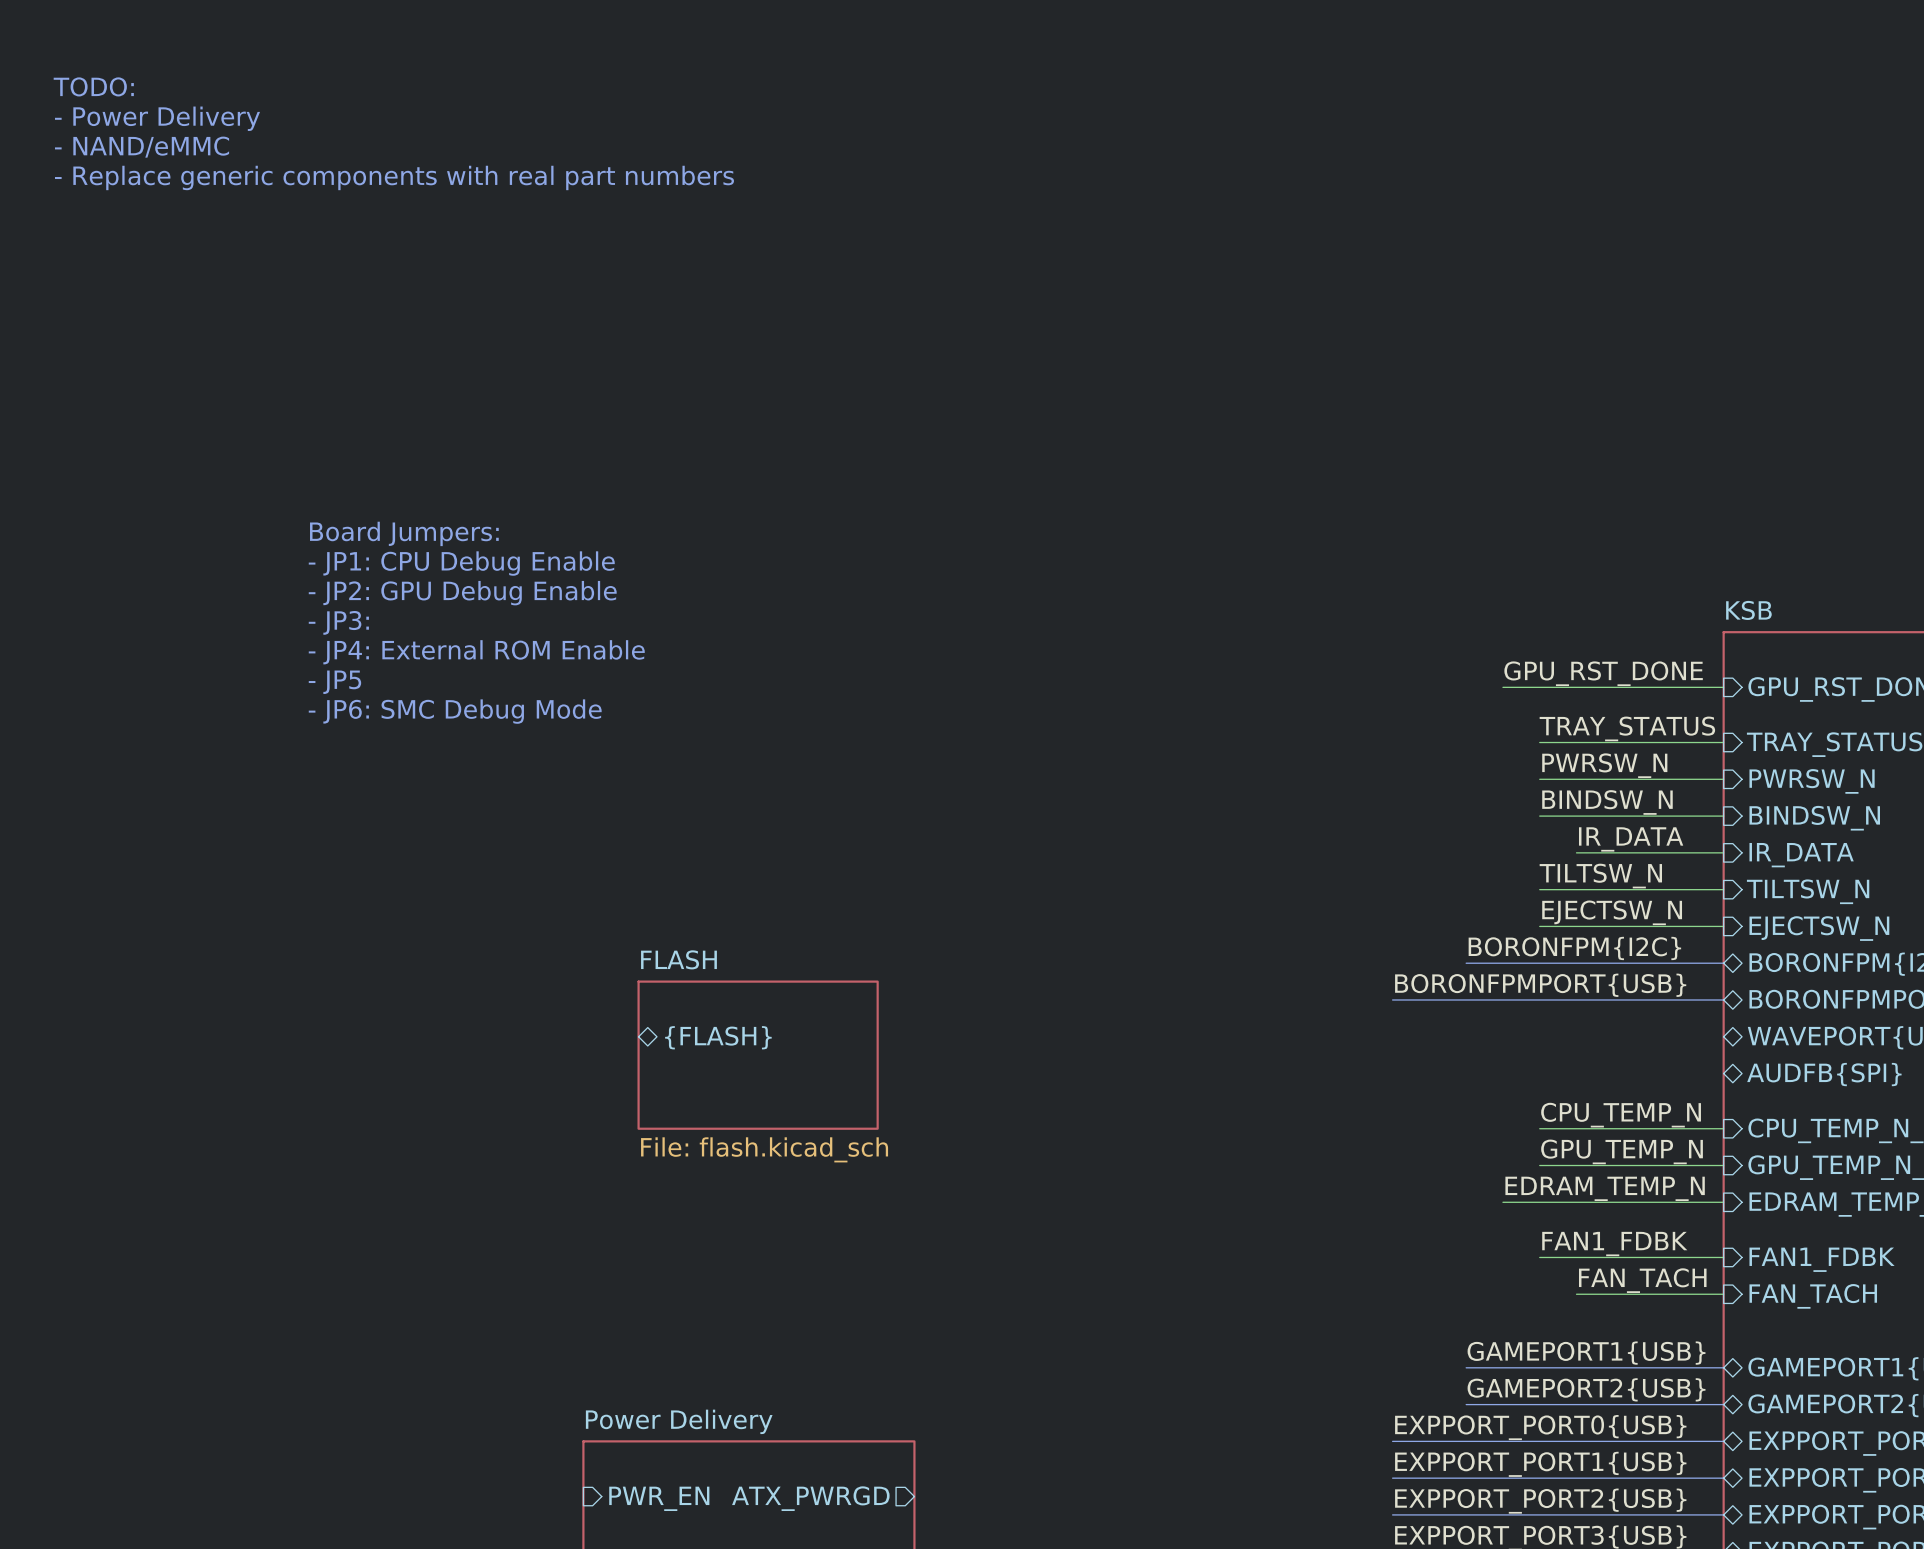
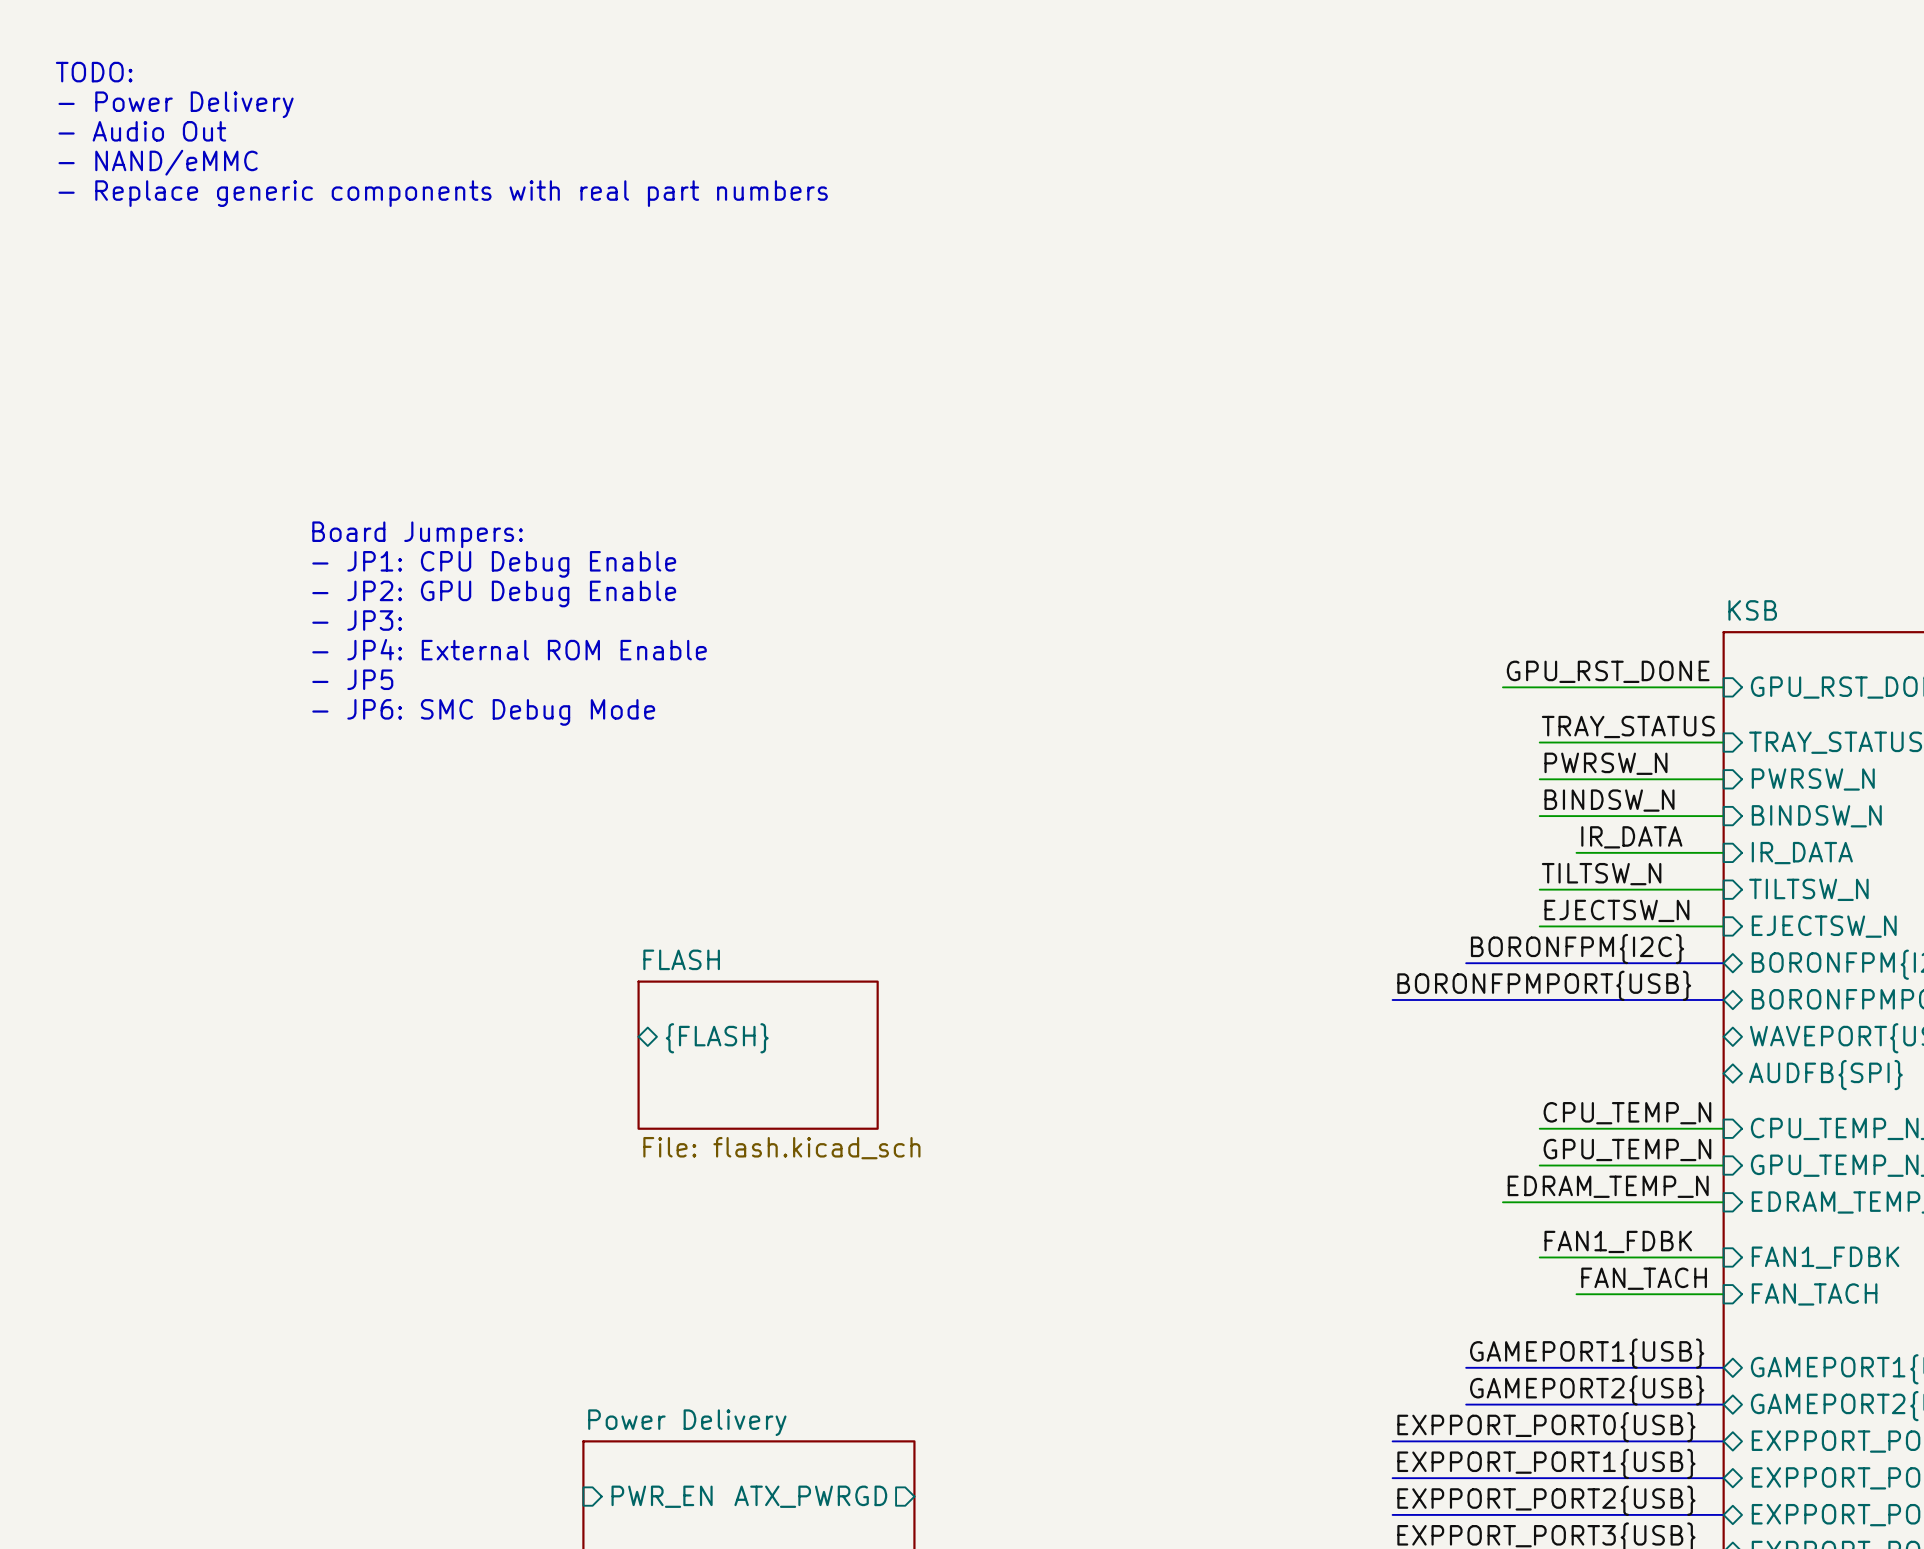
text position: TODO: (93, 86) -> TODO: (94, 72)
text position: - Power Delivery (157, 118) -> - Power Delivery (176, 104)
text: none -> - Audio Out (142, 131)
text position: - NAND/eMMC (142, 147) -> - NAND/eMMC (158, 162)
text position: - Replace generic components with real part numbers (394, 177) -> - Replace generic components with real part numbers (443, 193)

